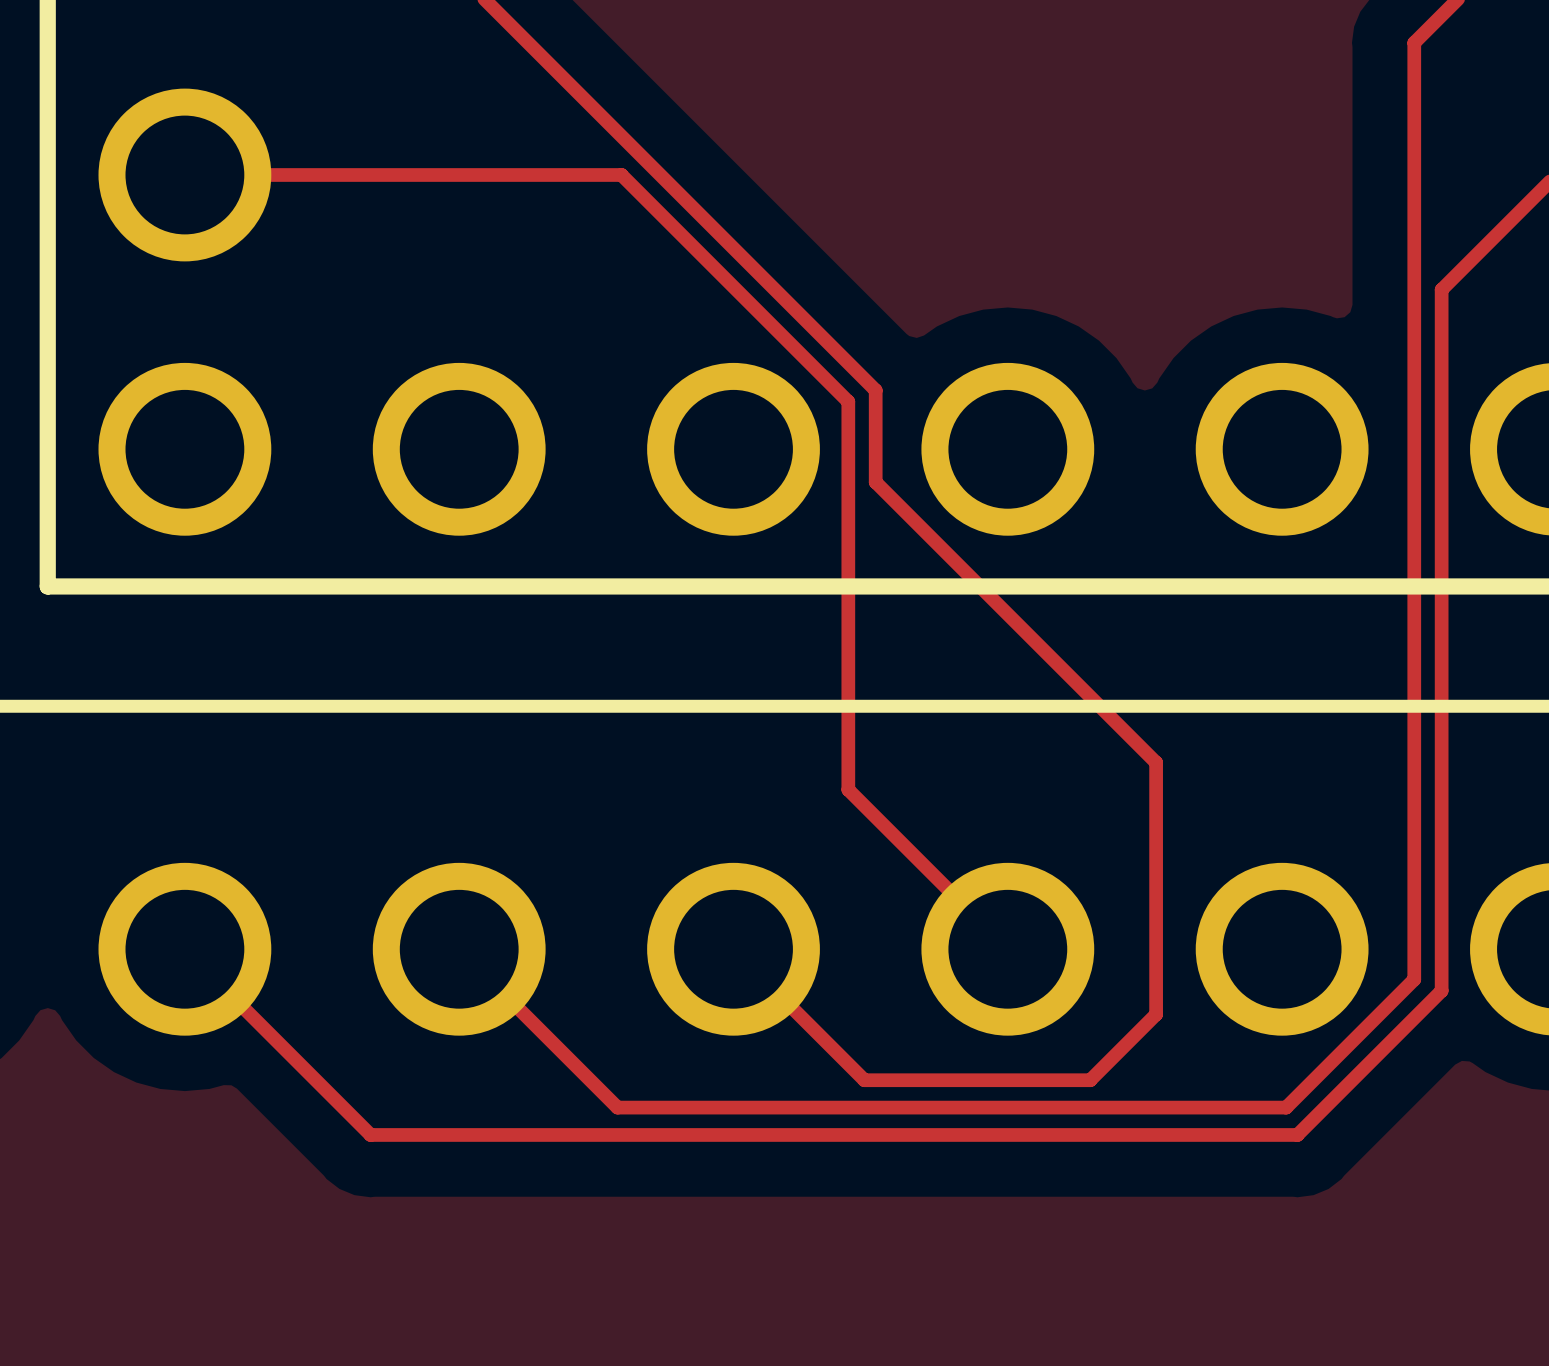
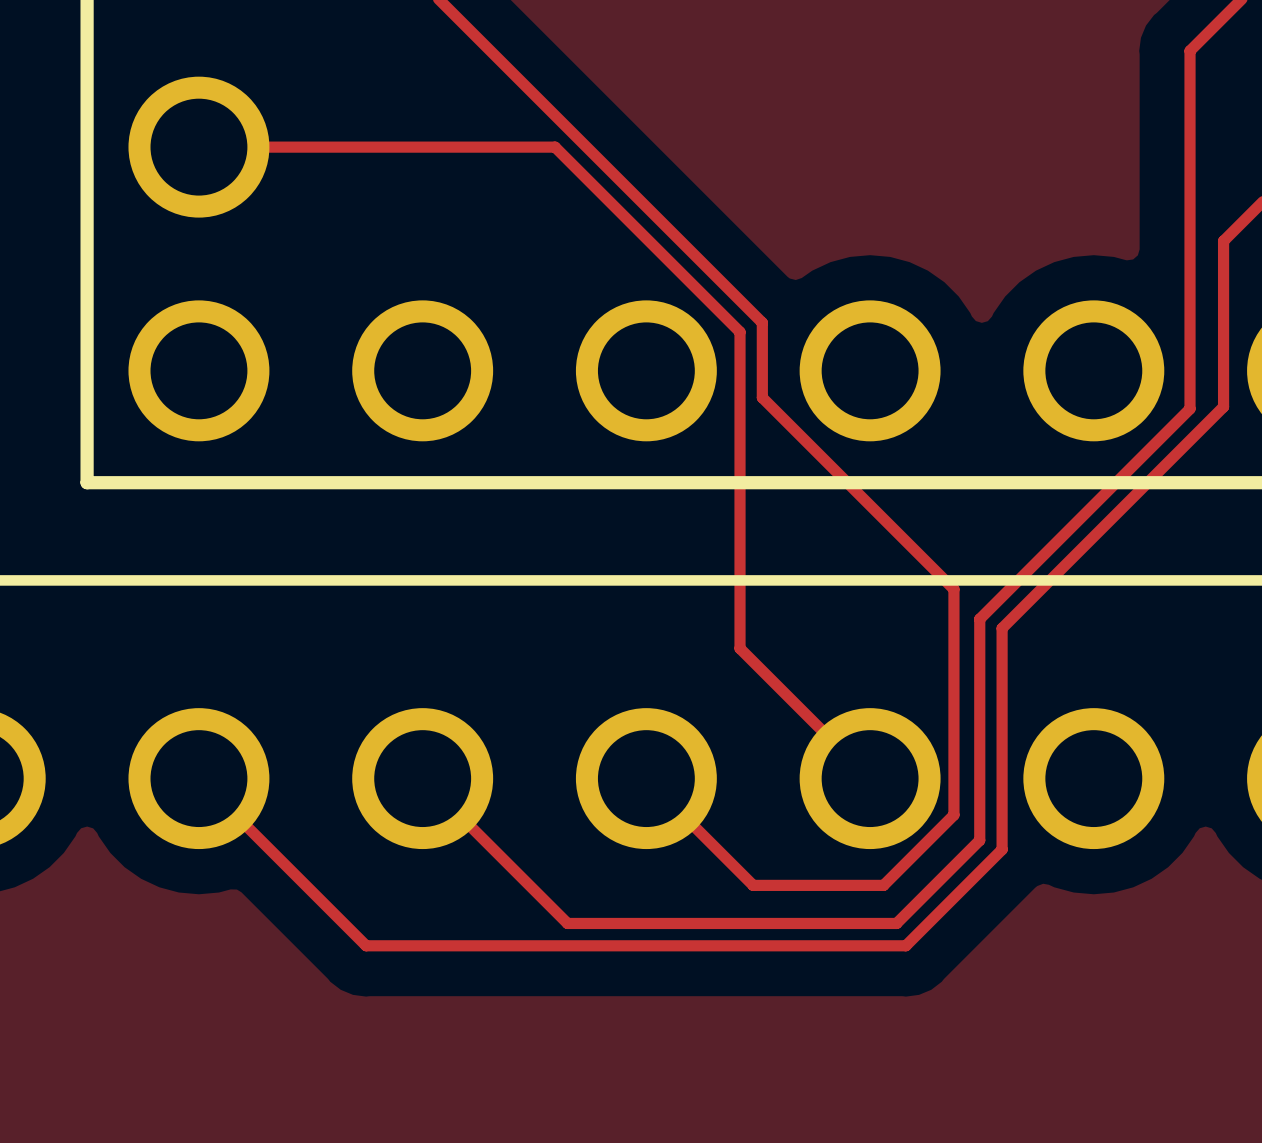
track: (1414, 42) (1414, 979) (1286, 1107) (617, 1107) -> (1201, 39) (1190, 50) (1190, 408) (979, 619) (979, 840) (896, 923) (567, 923) (551, 907)
track: (1441, 493) (1441, 990) (1297, 1134) (370, 1134) -> (1223, 406) (1002, 628) (1002, 849) (905, 945) (366, 945) (350, 930)
track: (1110, 717) (1156, 762) (1156, 1014) (1090, 1080) (1024, 1080) -> (953, 589) (953, 815) (883, 885)

